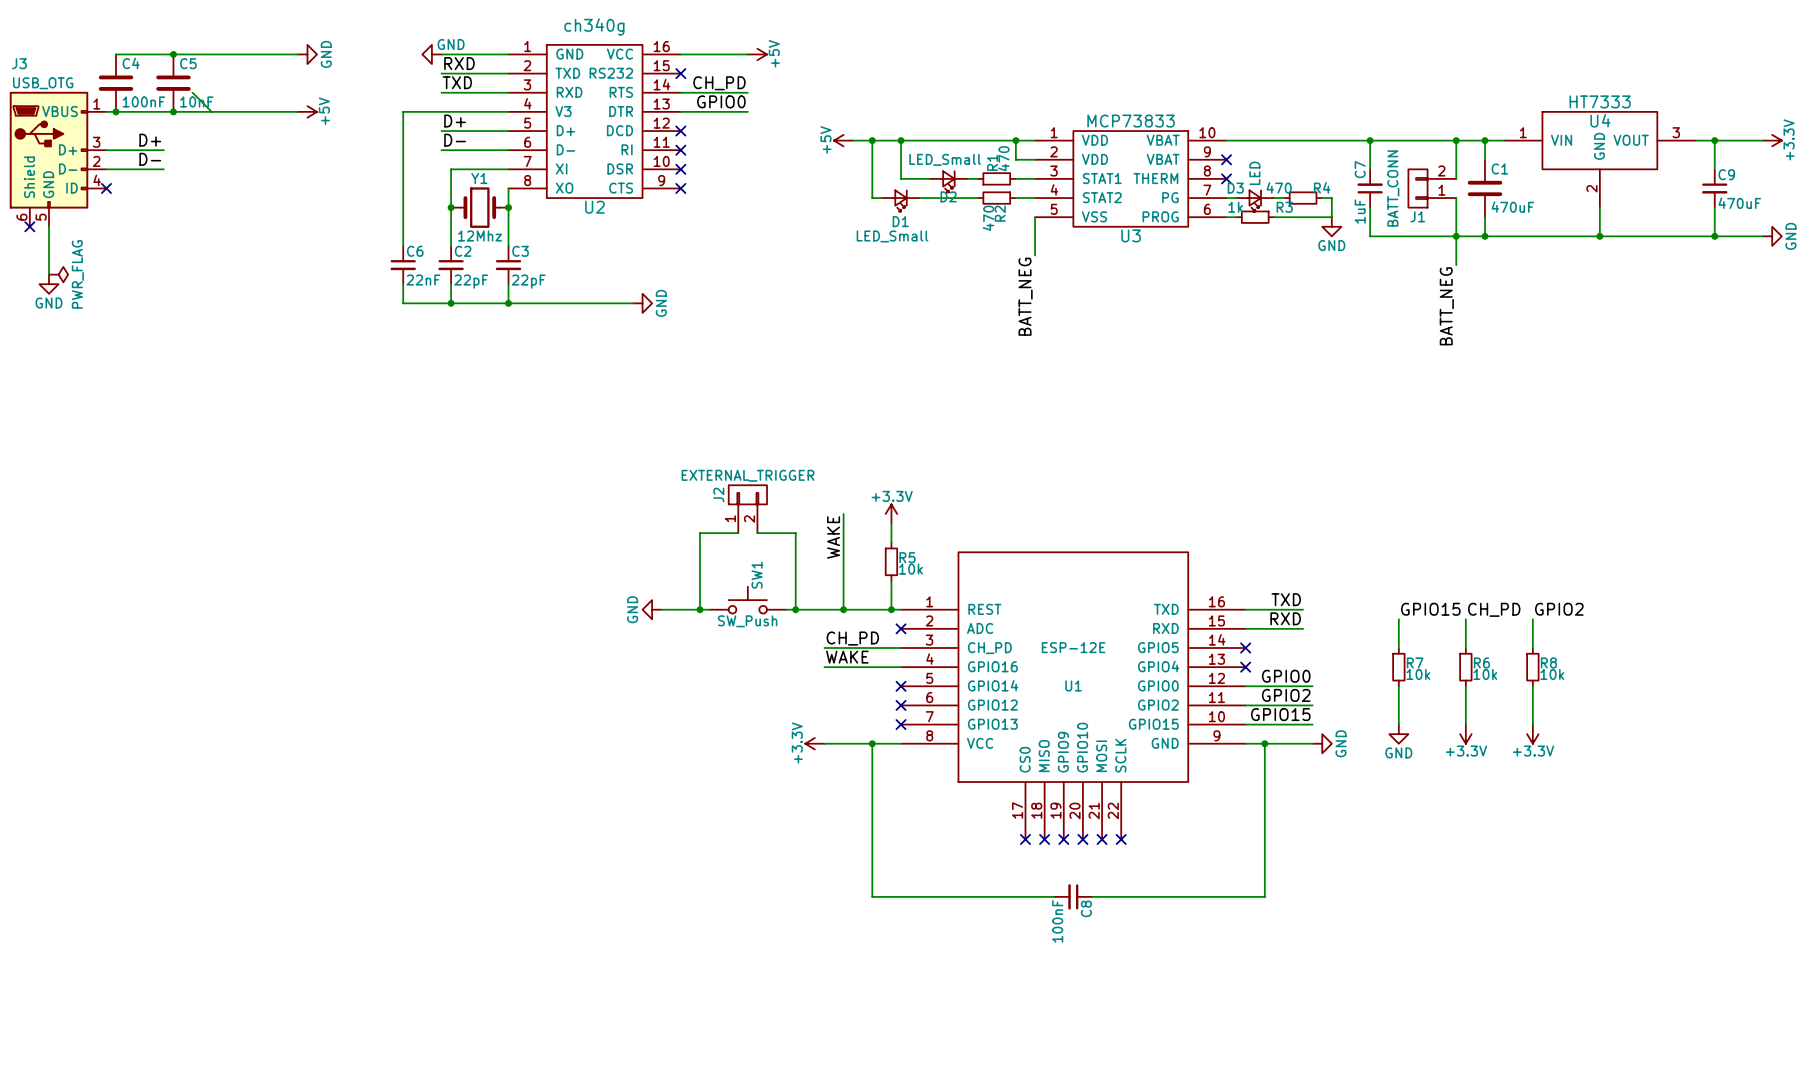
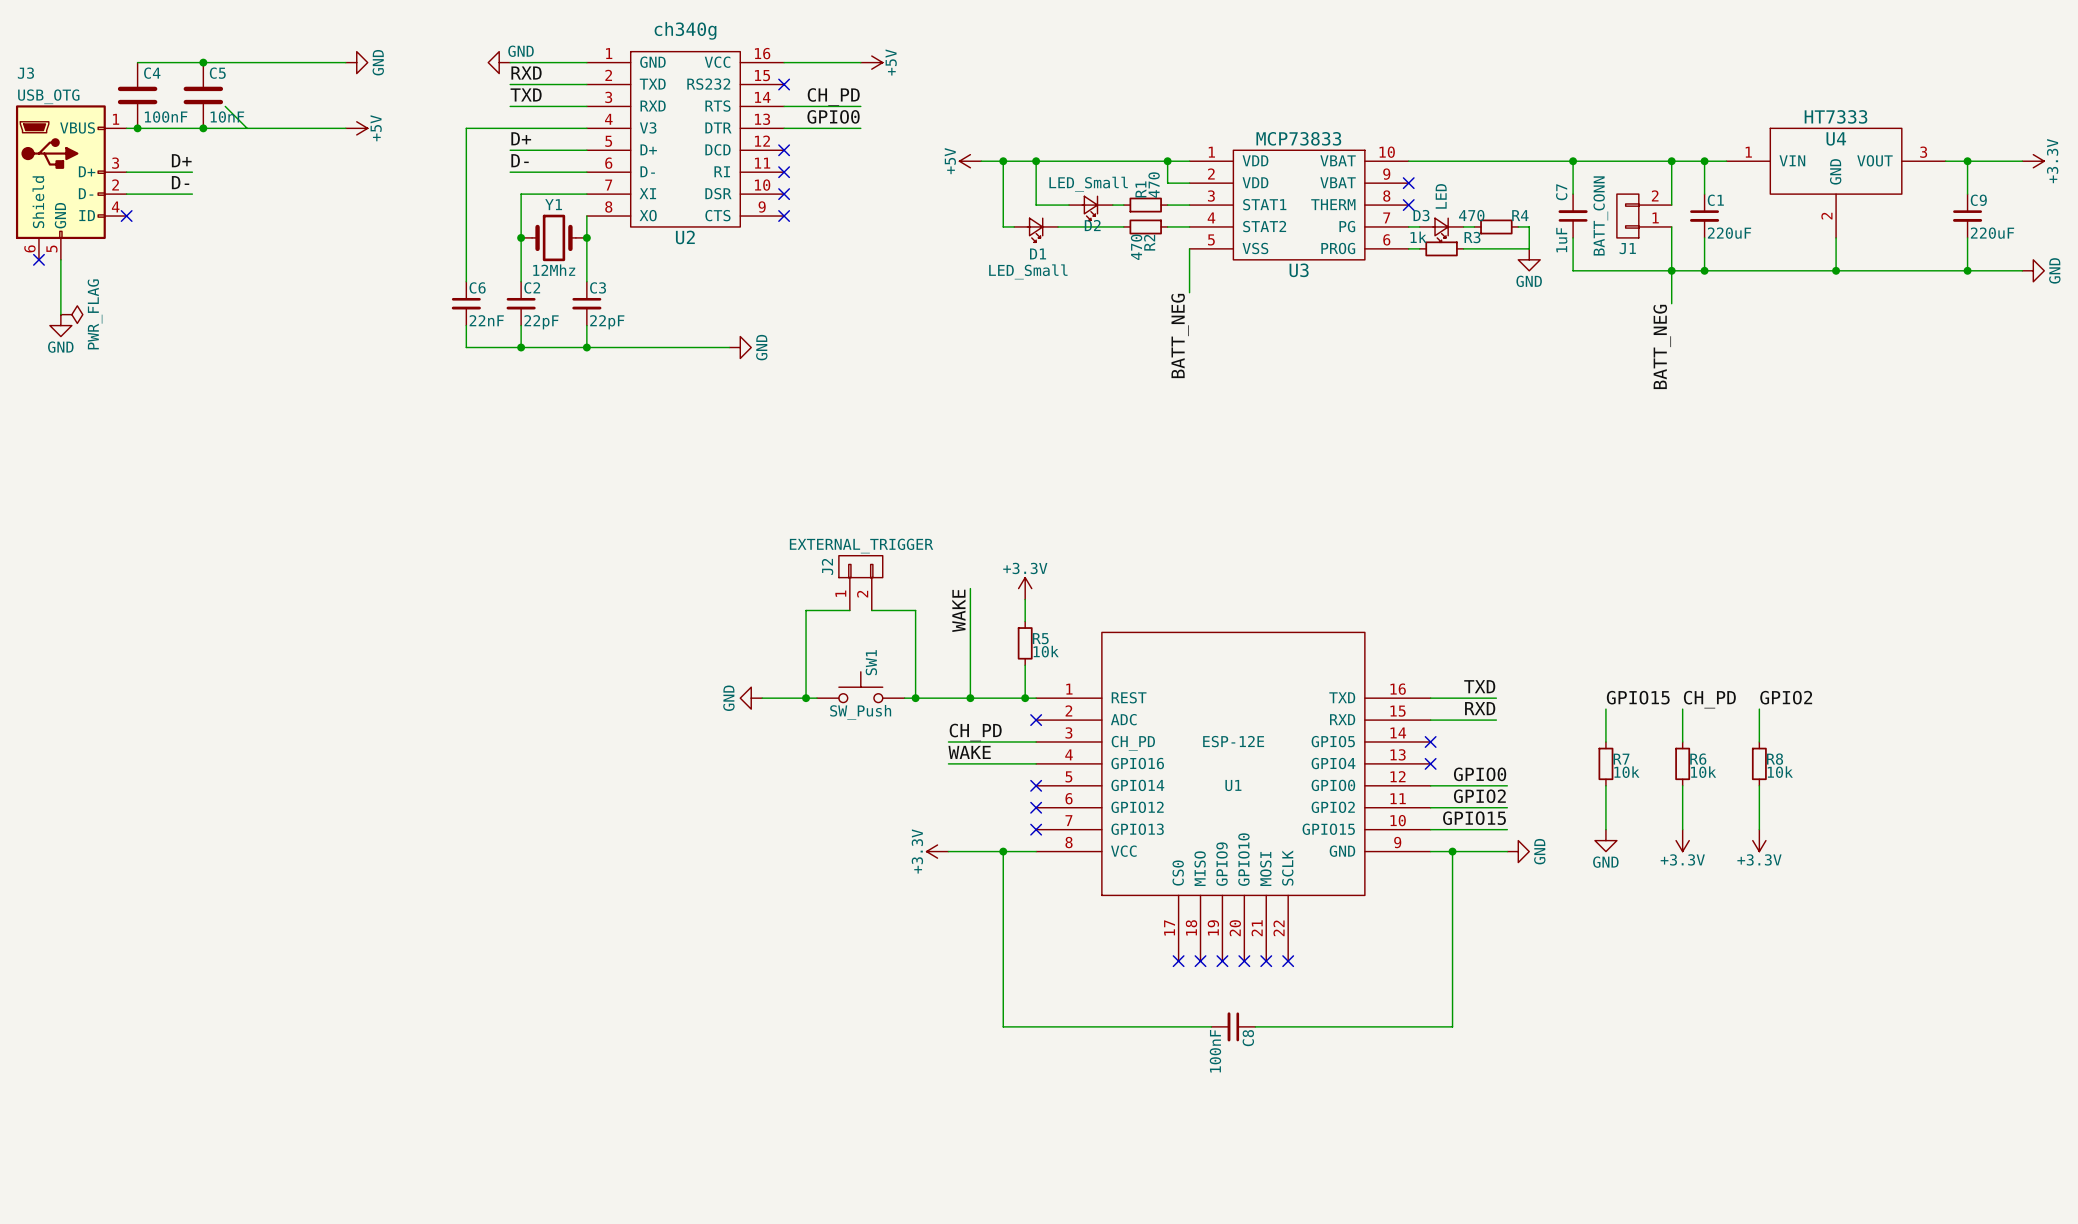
C1 symbol: [1467, 159, 1503, 218] -> [1690, 194, 1720, 238]
C9 value: 470uF (1739, 203) -> 220uF (1992, 233)
C1 value: 470uF (1512, 207) -> 220uF (1729, 233)

